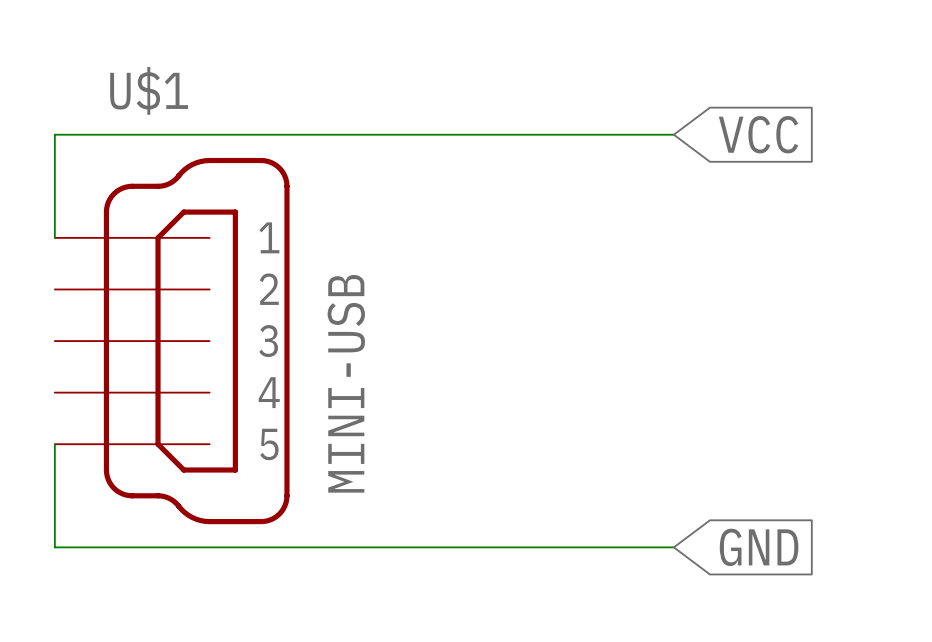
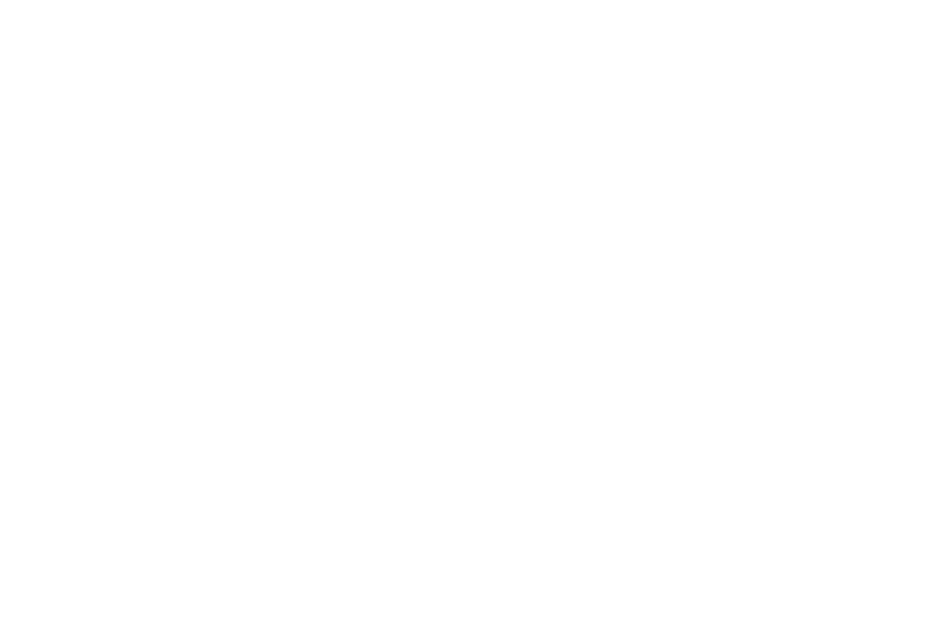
wire: (673, 134) (54, 134) (54, 237) -> none
global label: VCC (758, 134) -> none
U$1: MINI-USB (172, 341) -> none
wire: (54, 444) (54, 547) (673, 547) -> none
global label: GND (759, 547) -> none

